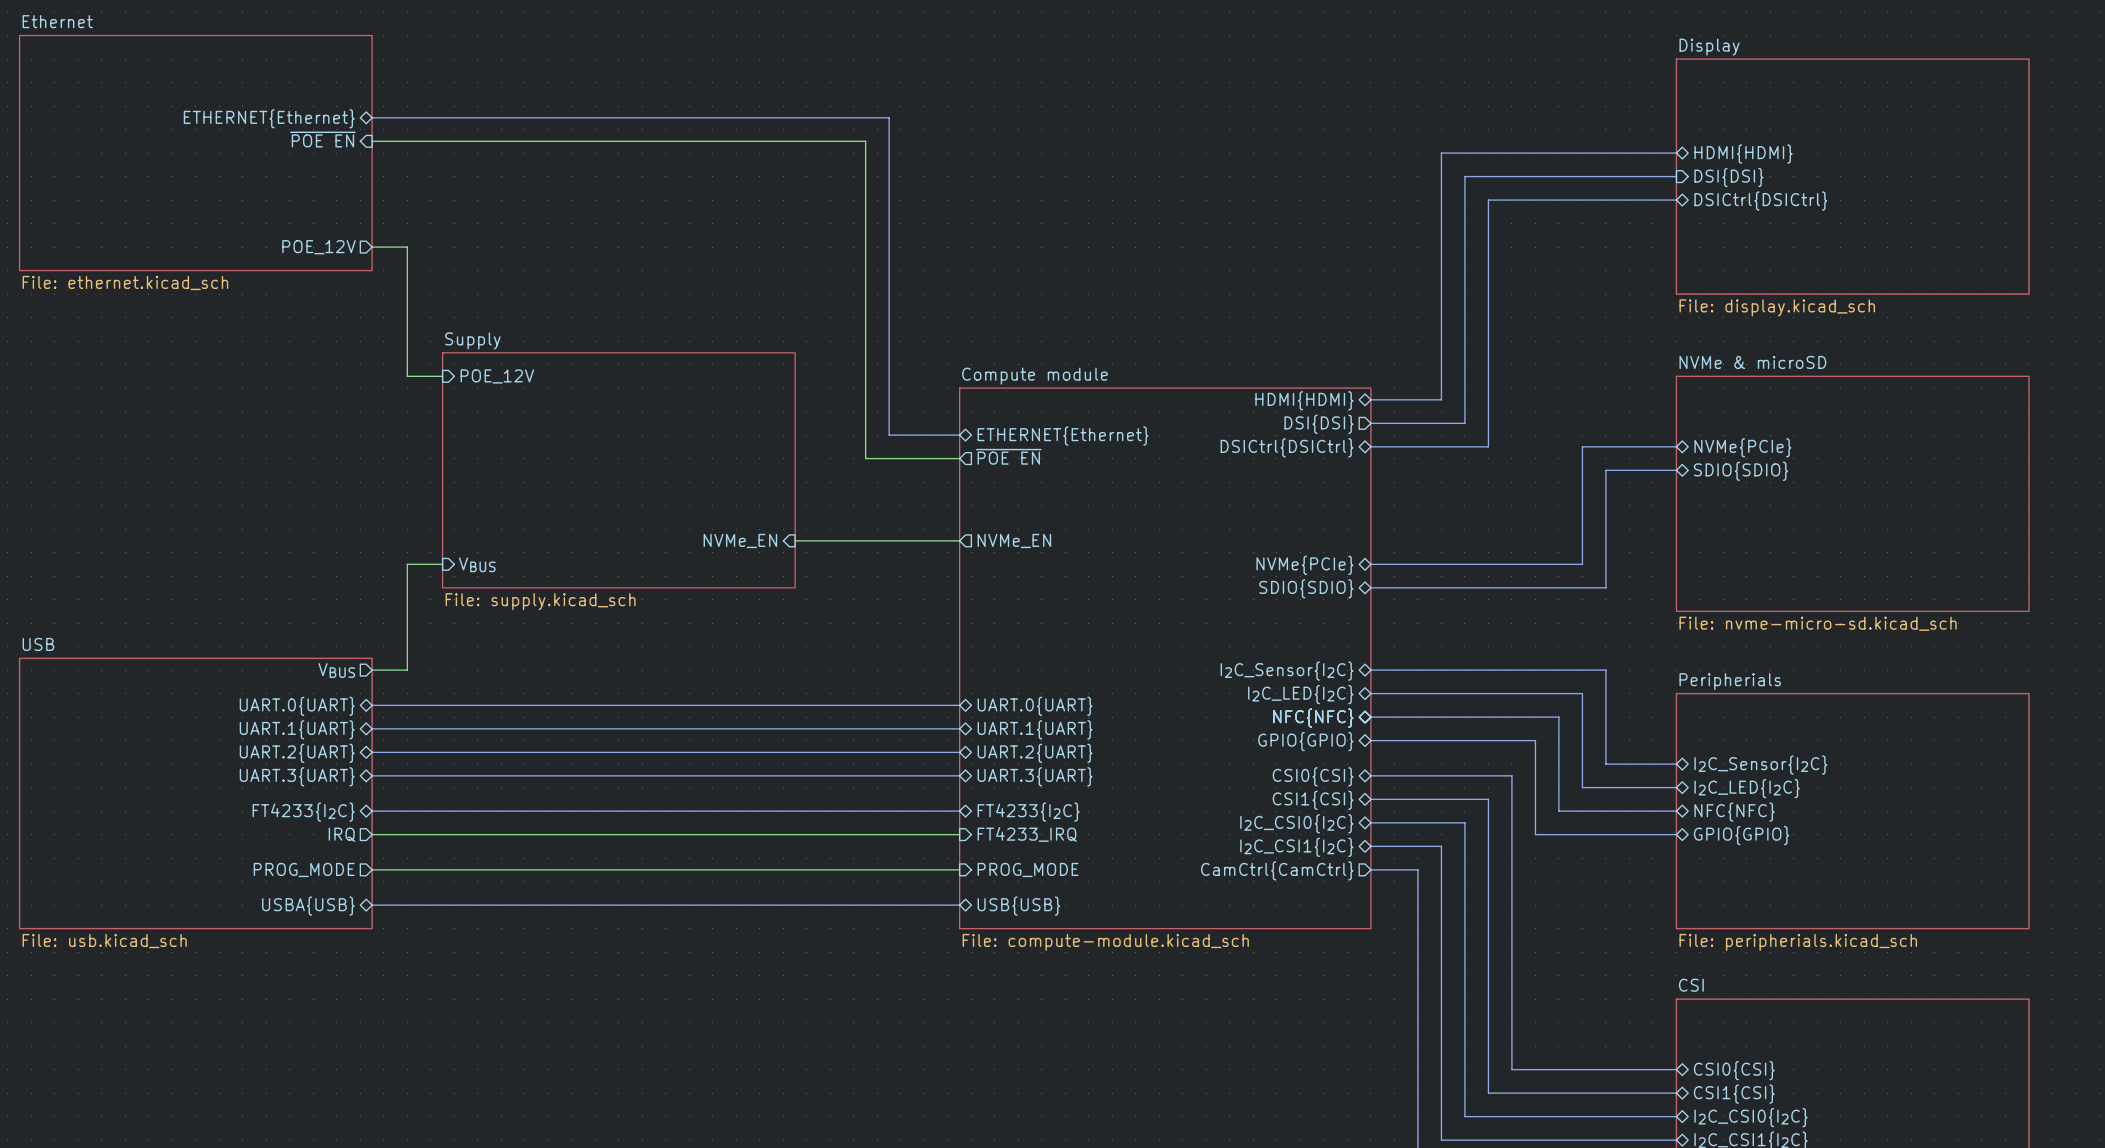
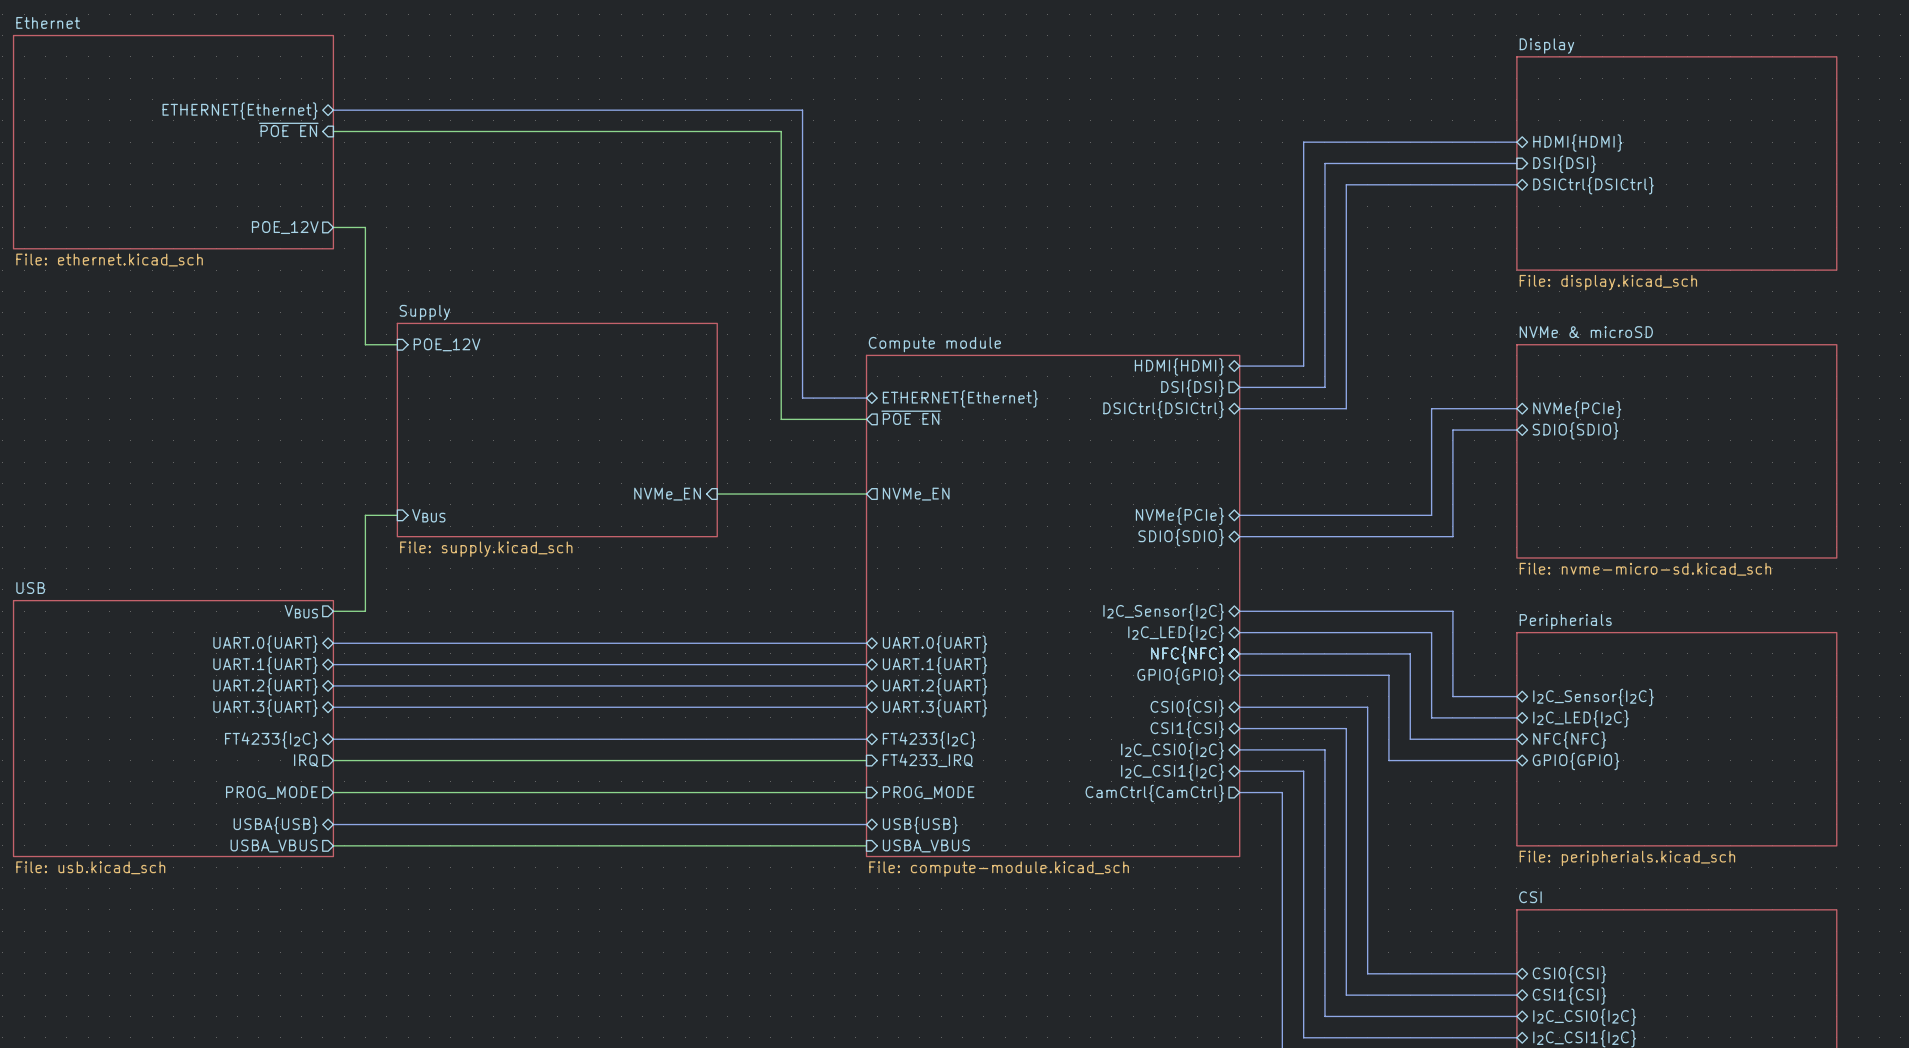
sheet Compute module shape: [959, 388, 1371, 929] -> [866, 355, 1240, 857]
sheet USB shape: [18, 657, 373, 930] -> [12, 599, 335, 858]
sheet pin: none -> USBA_VBUS (274, 845)
wire: none -> (333, 845) (866, 845)
sheet pin: none -> USBA_VBUS (926, 845)

